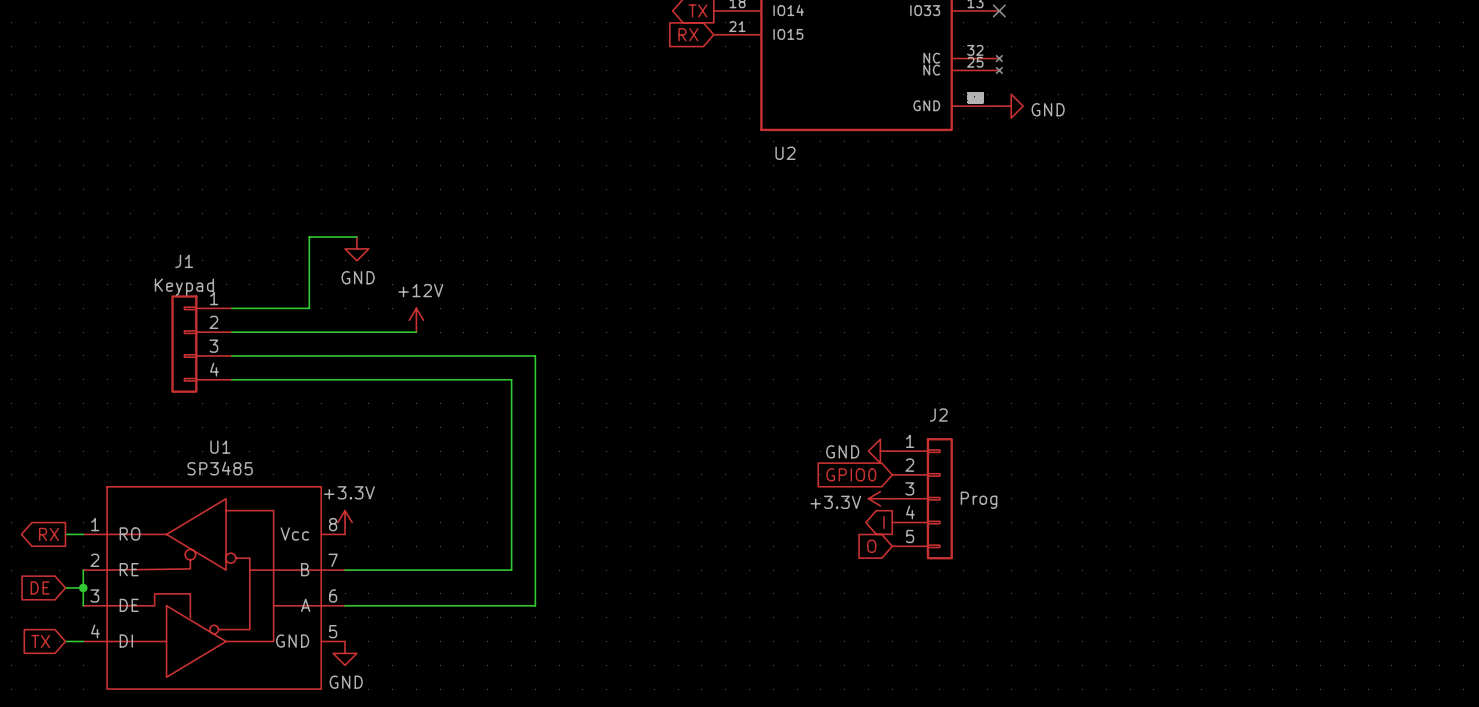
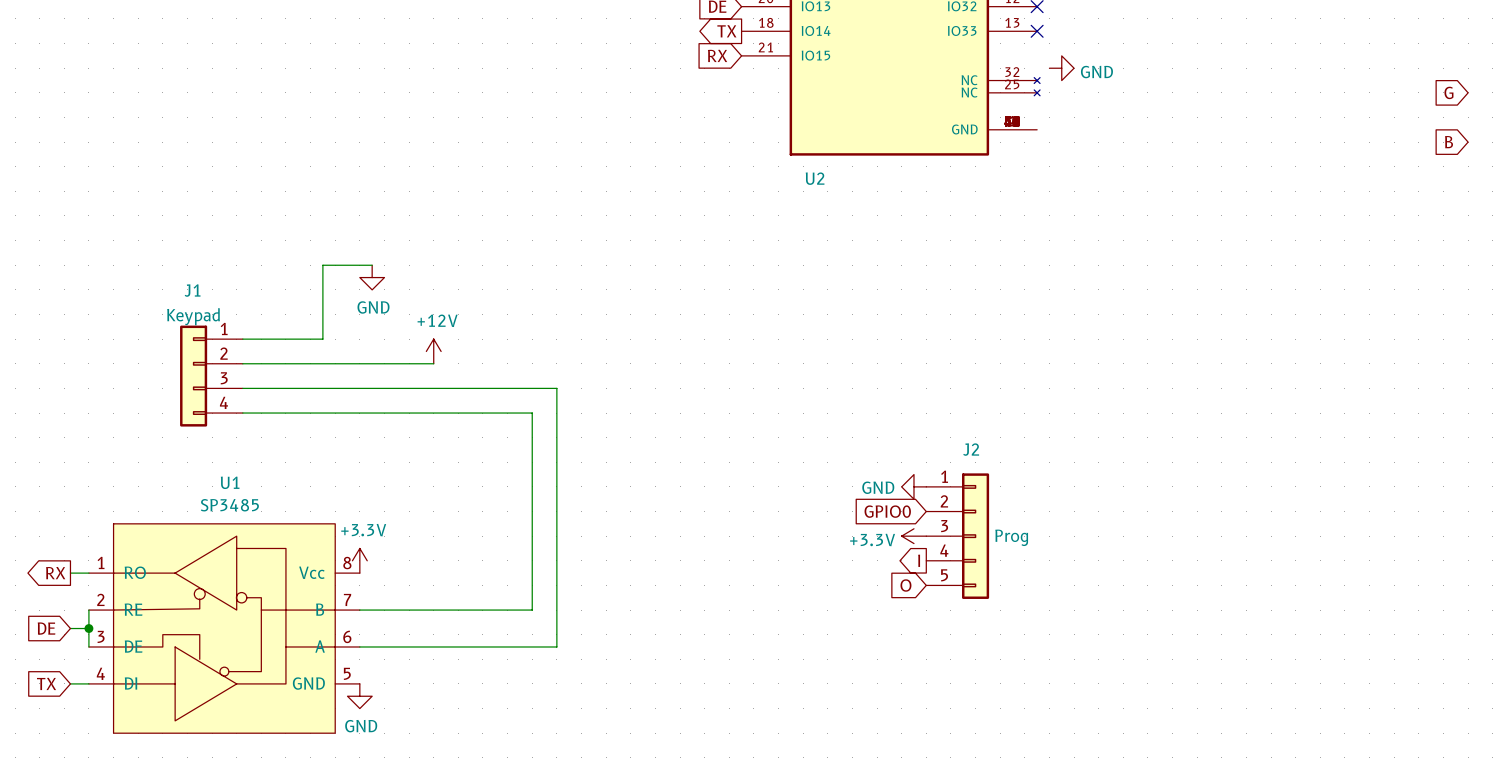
global label: none -> G (1448, 92)
power symbol position: GND (1011, 106) -> GND (1061, 68)
global label: none -> B (1449, 142)

